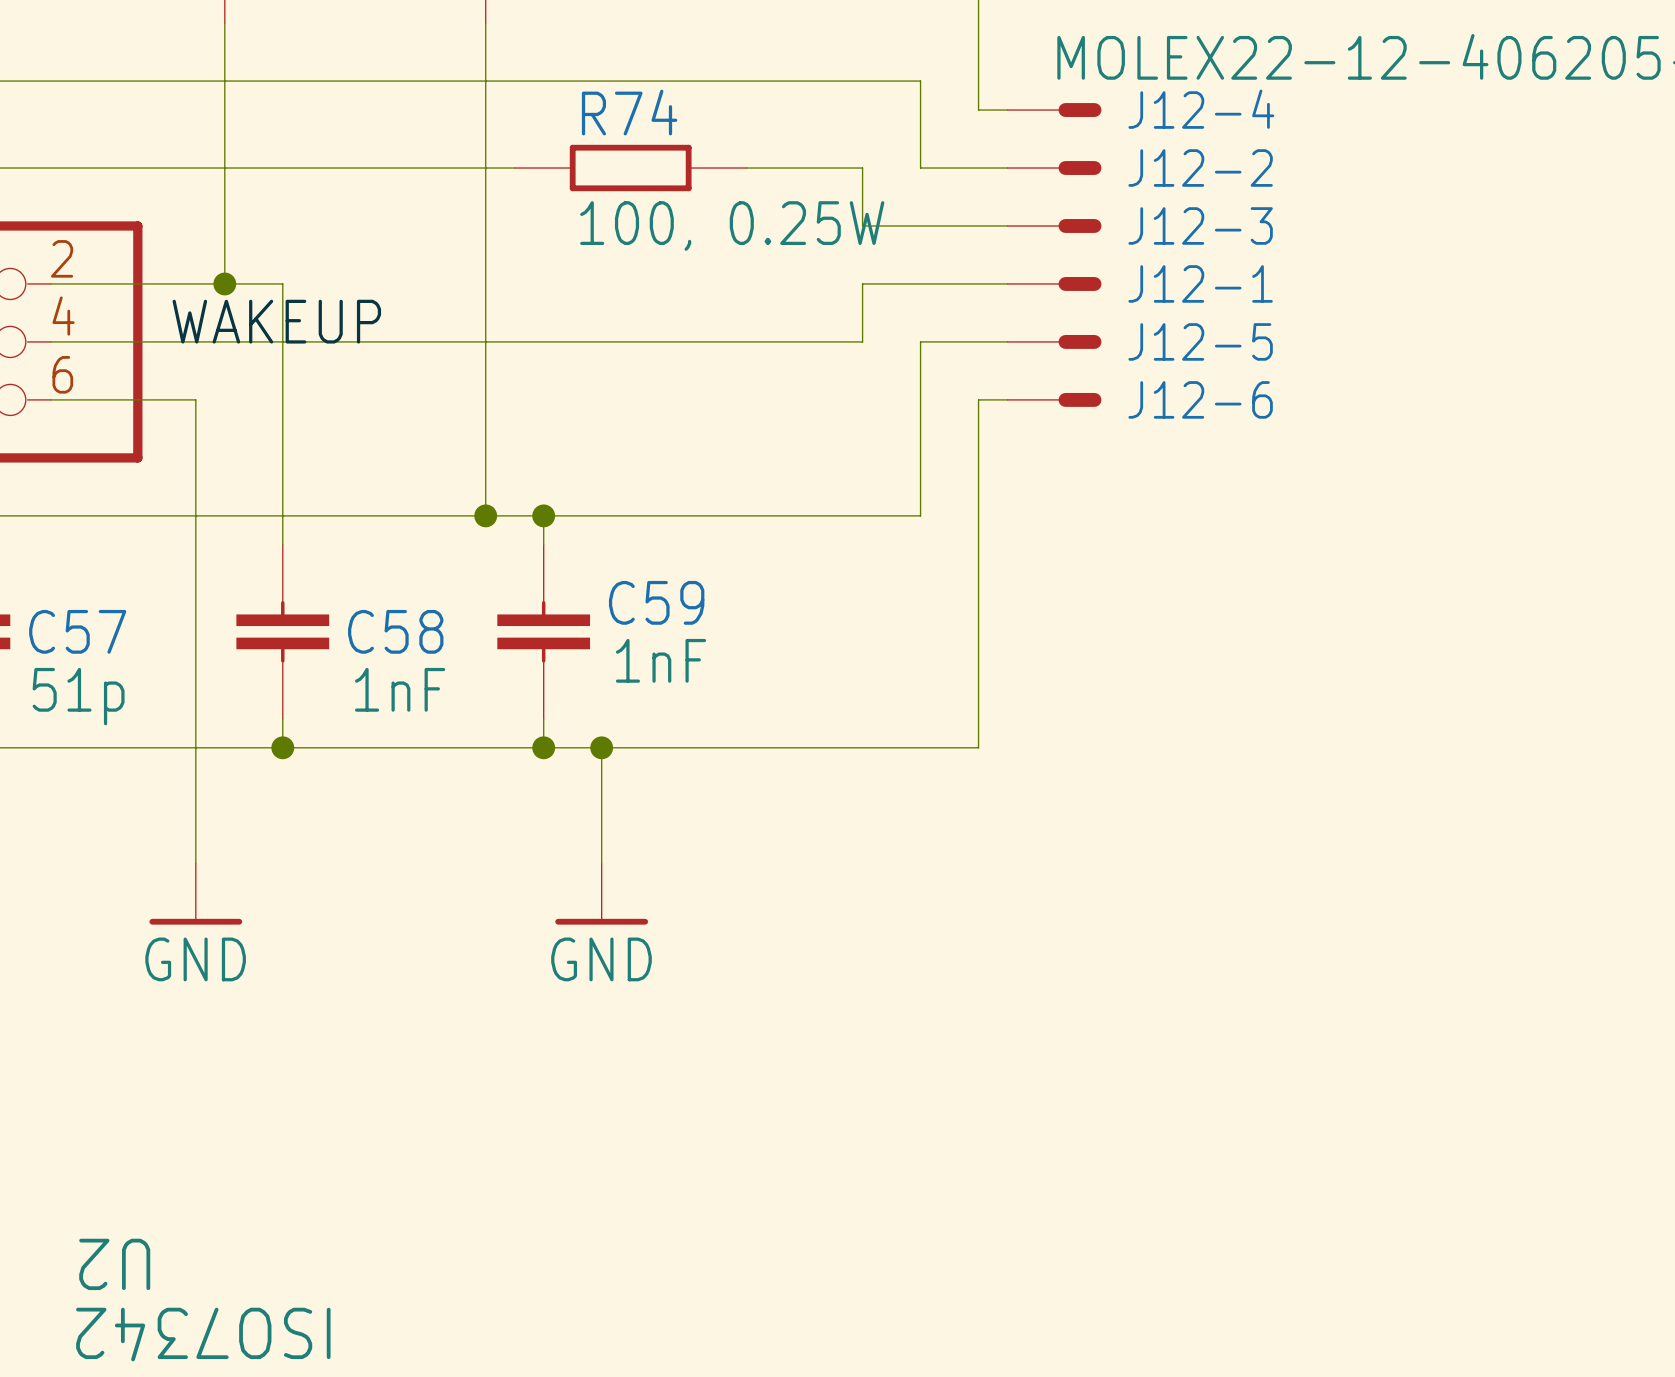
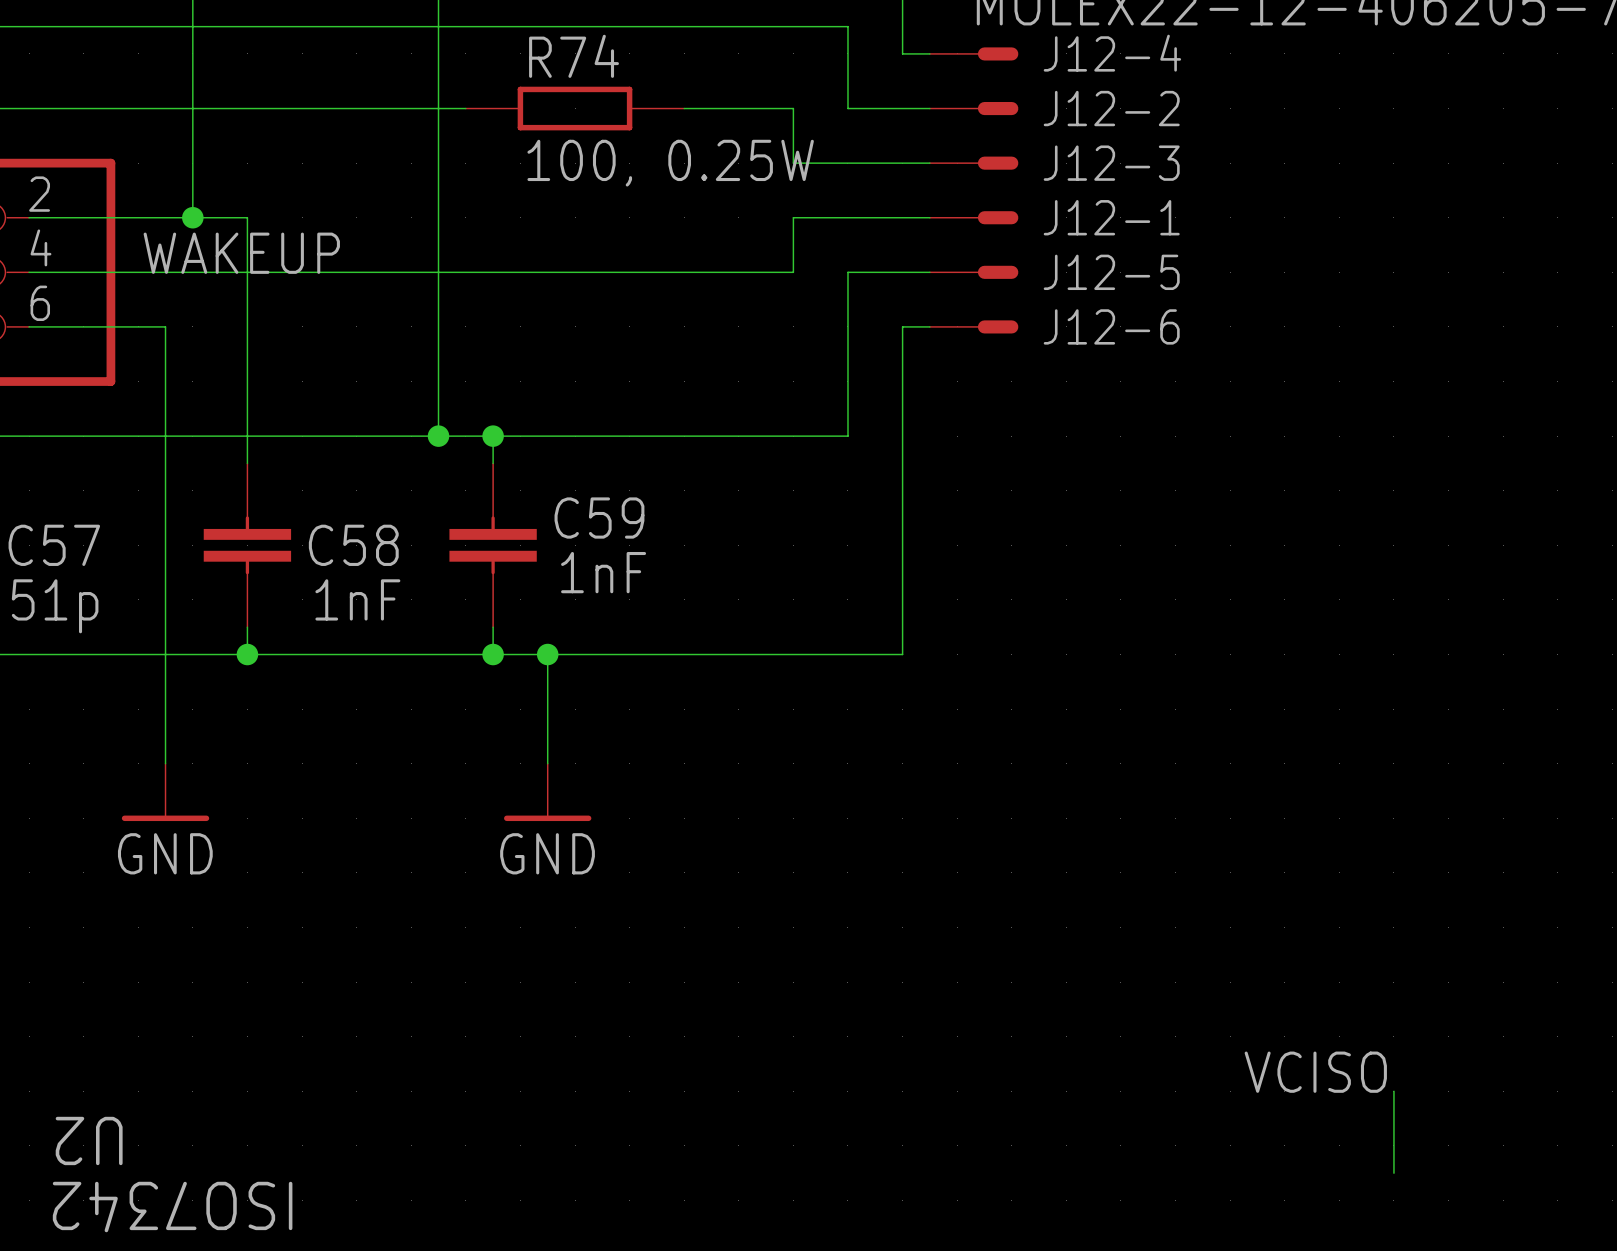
label: none -> VCISO (1315, 1072)
wire: none -> (1393, 1091) (1393, 1173)

